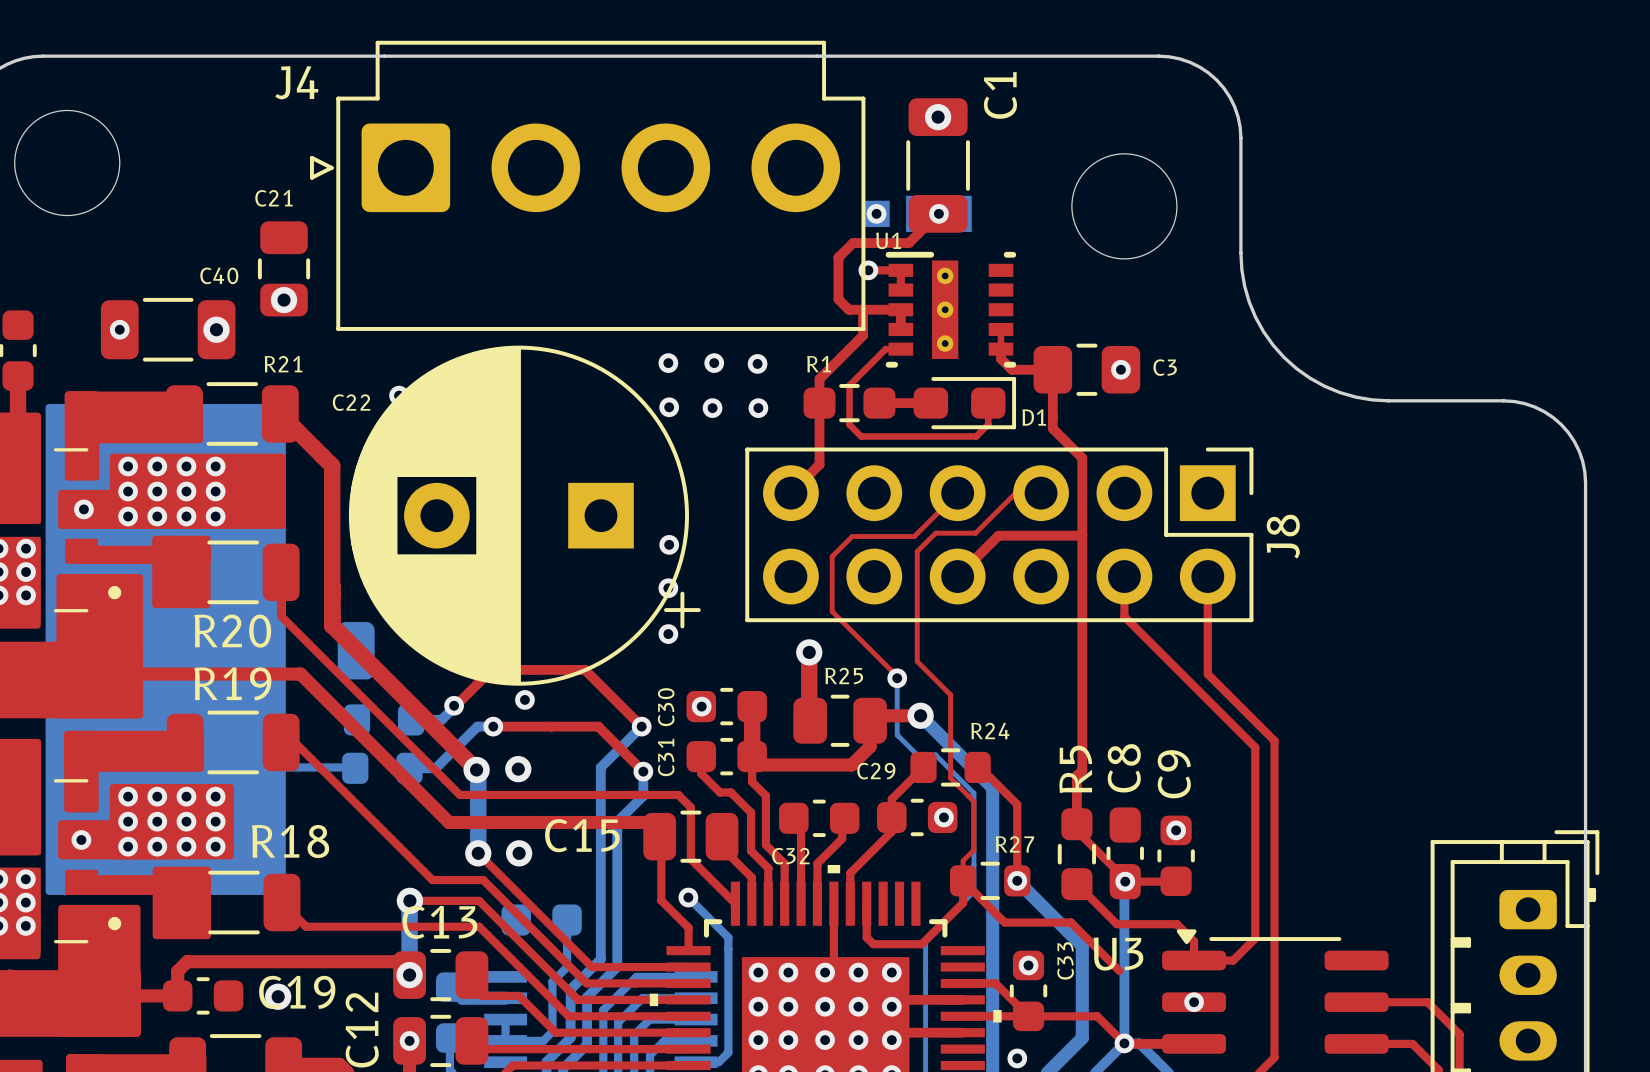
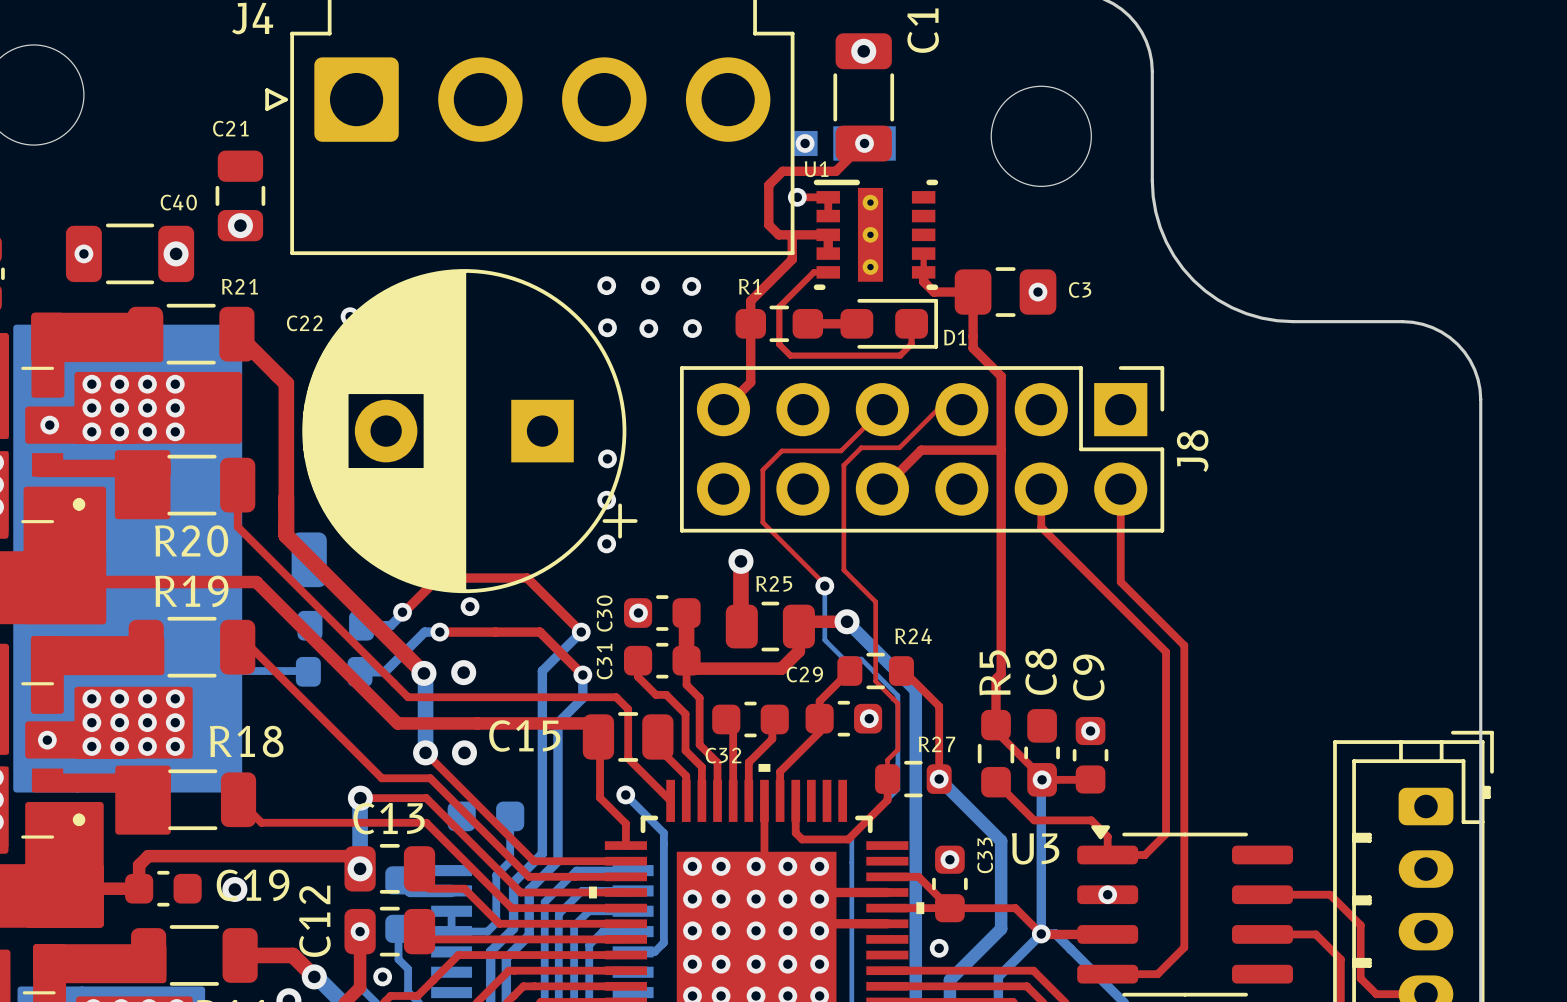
top track: (963, 880) (1004, 922) (1071, 922) (1119, 970) -> none

